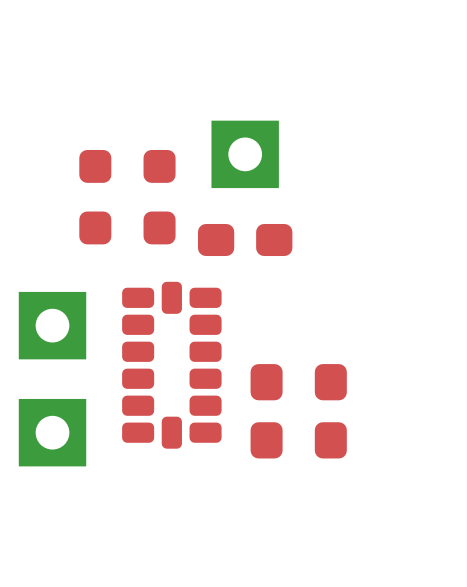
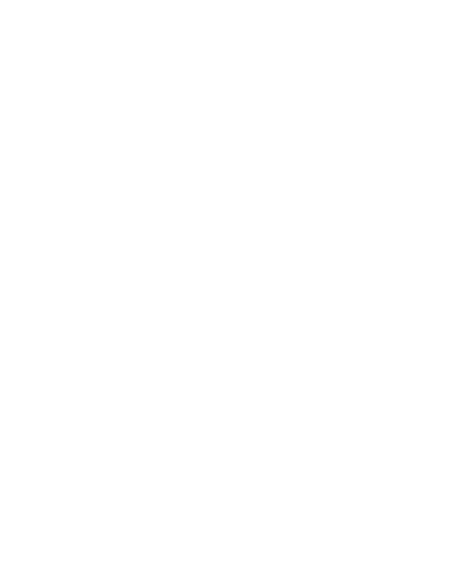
part: (245, 154) -> none
part: (95, 197) -> none
part: (159, 197) -> none
part: (245, 240) -> none
part: (52, 325) -> none
part: (171, 365) -> none
part: (266, 411) -> none
part: (330, 411) -> none
part: (52, 432) -> none

